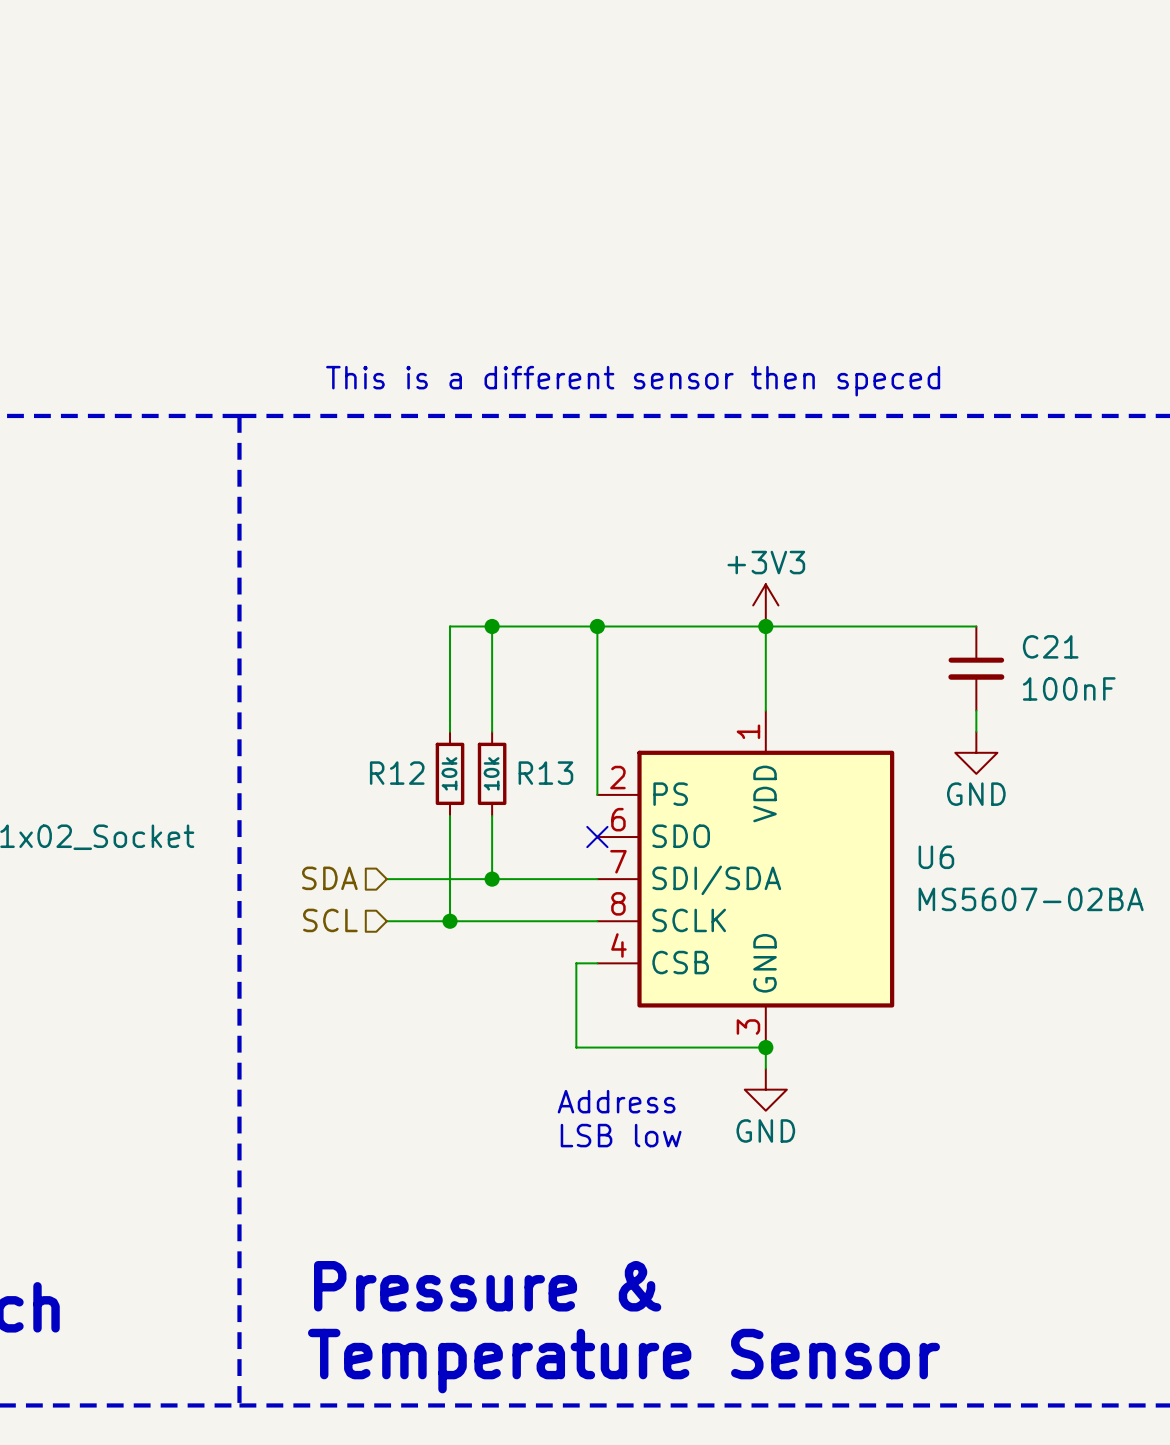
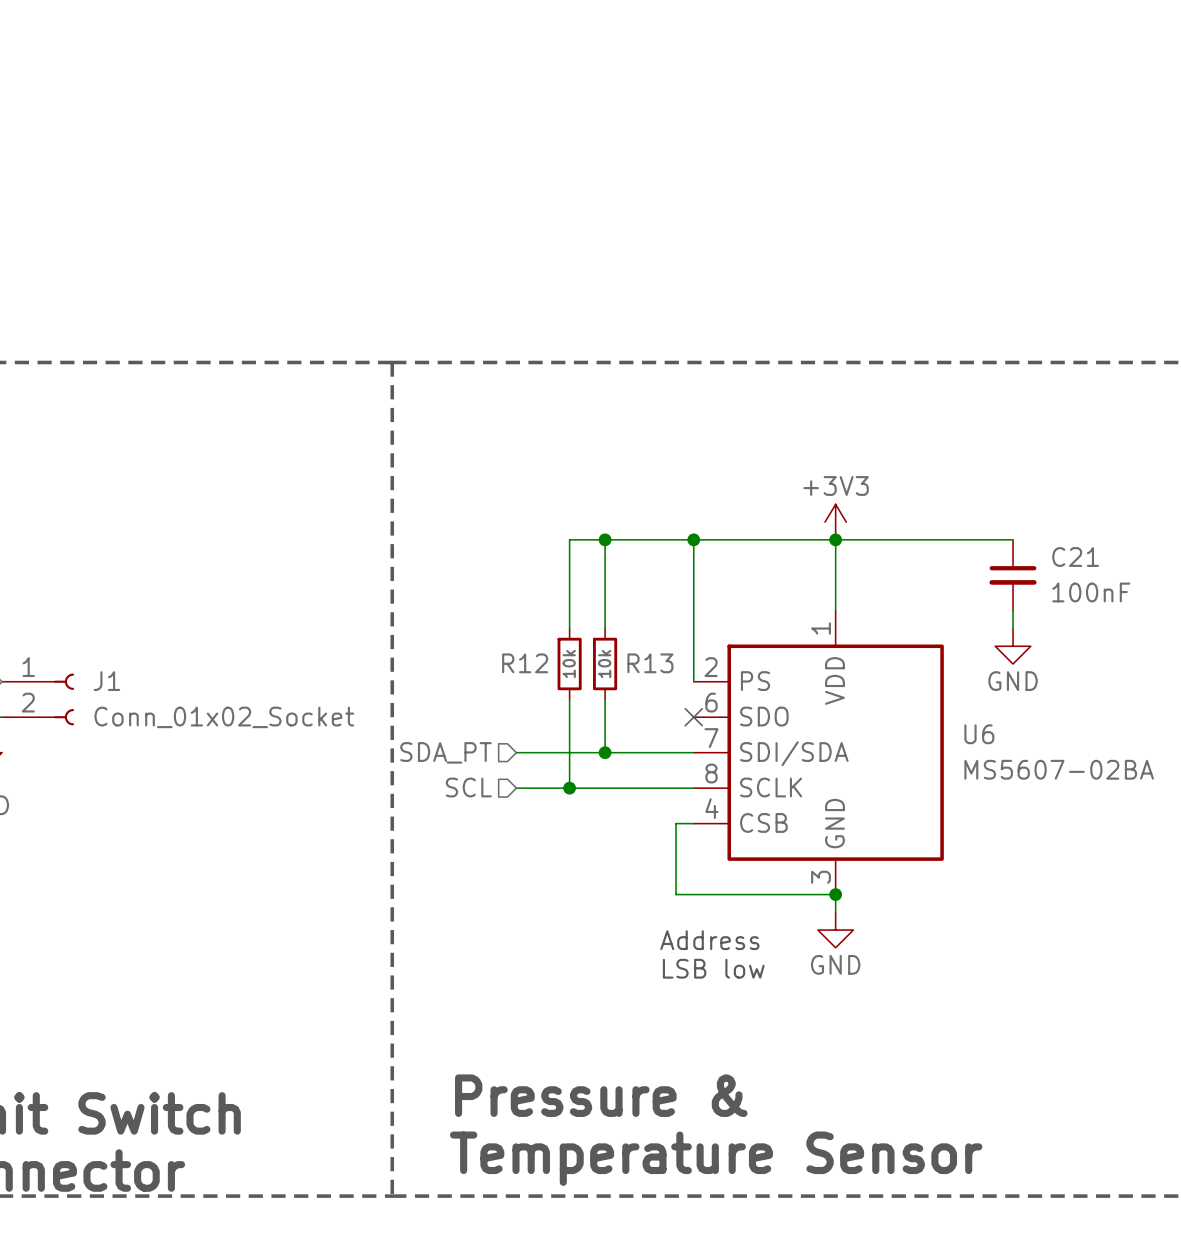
text: This is a different sensor then speced (633, 381) -> none
hierarchical label: SDA (329, 878) -> SDA_PT (446, 752)

